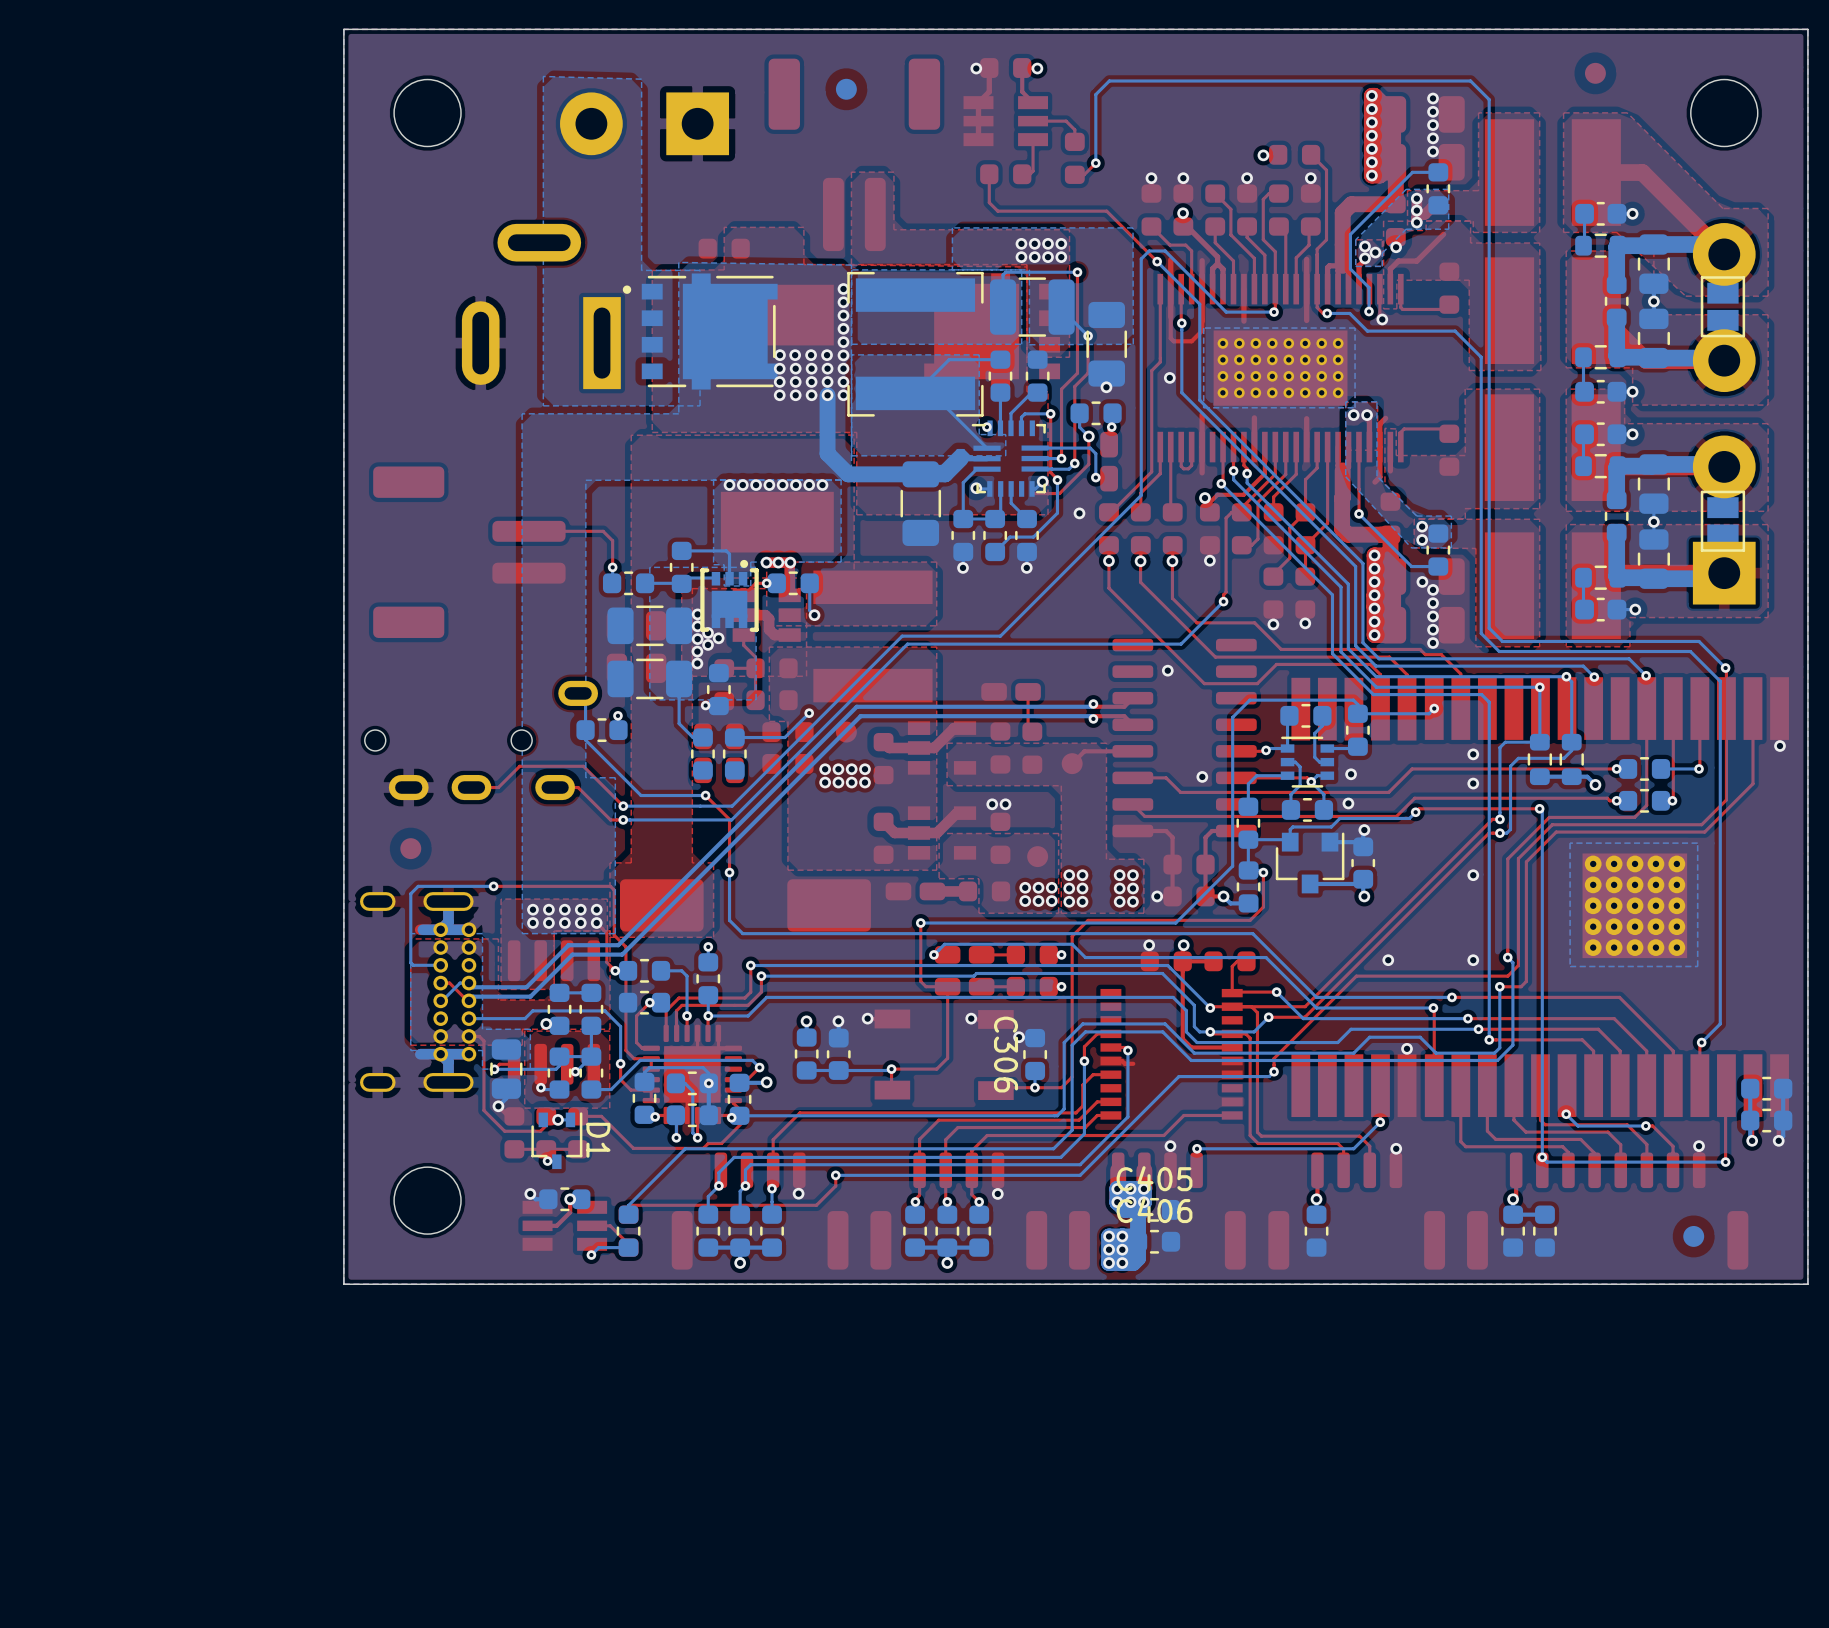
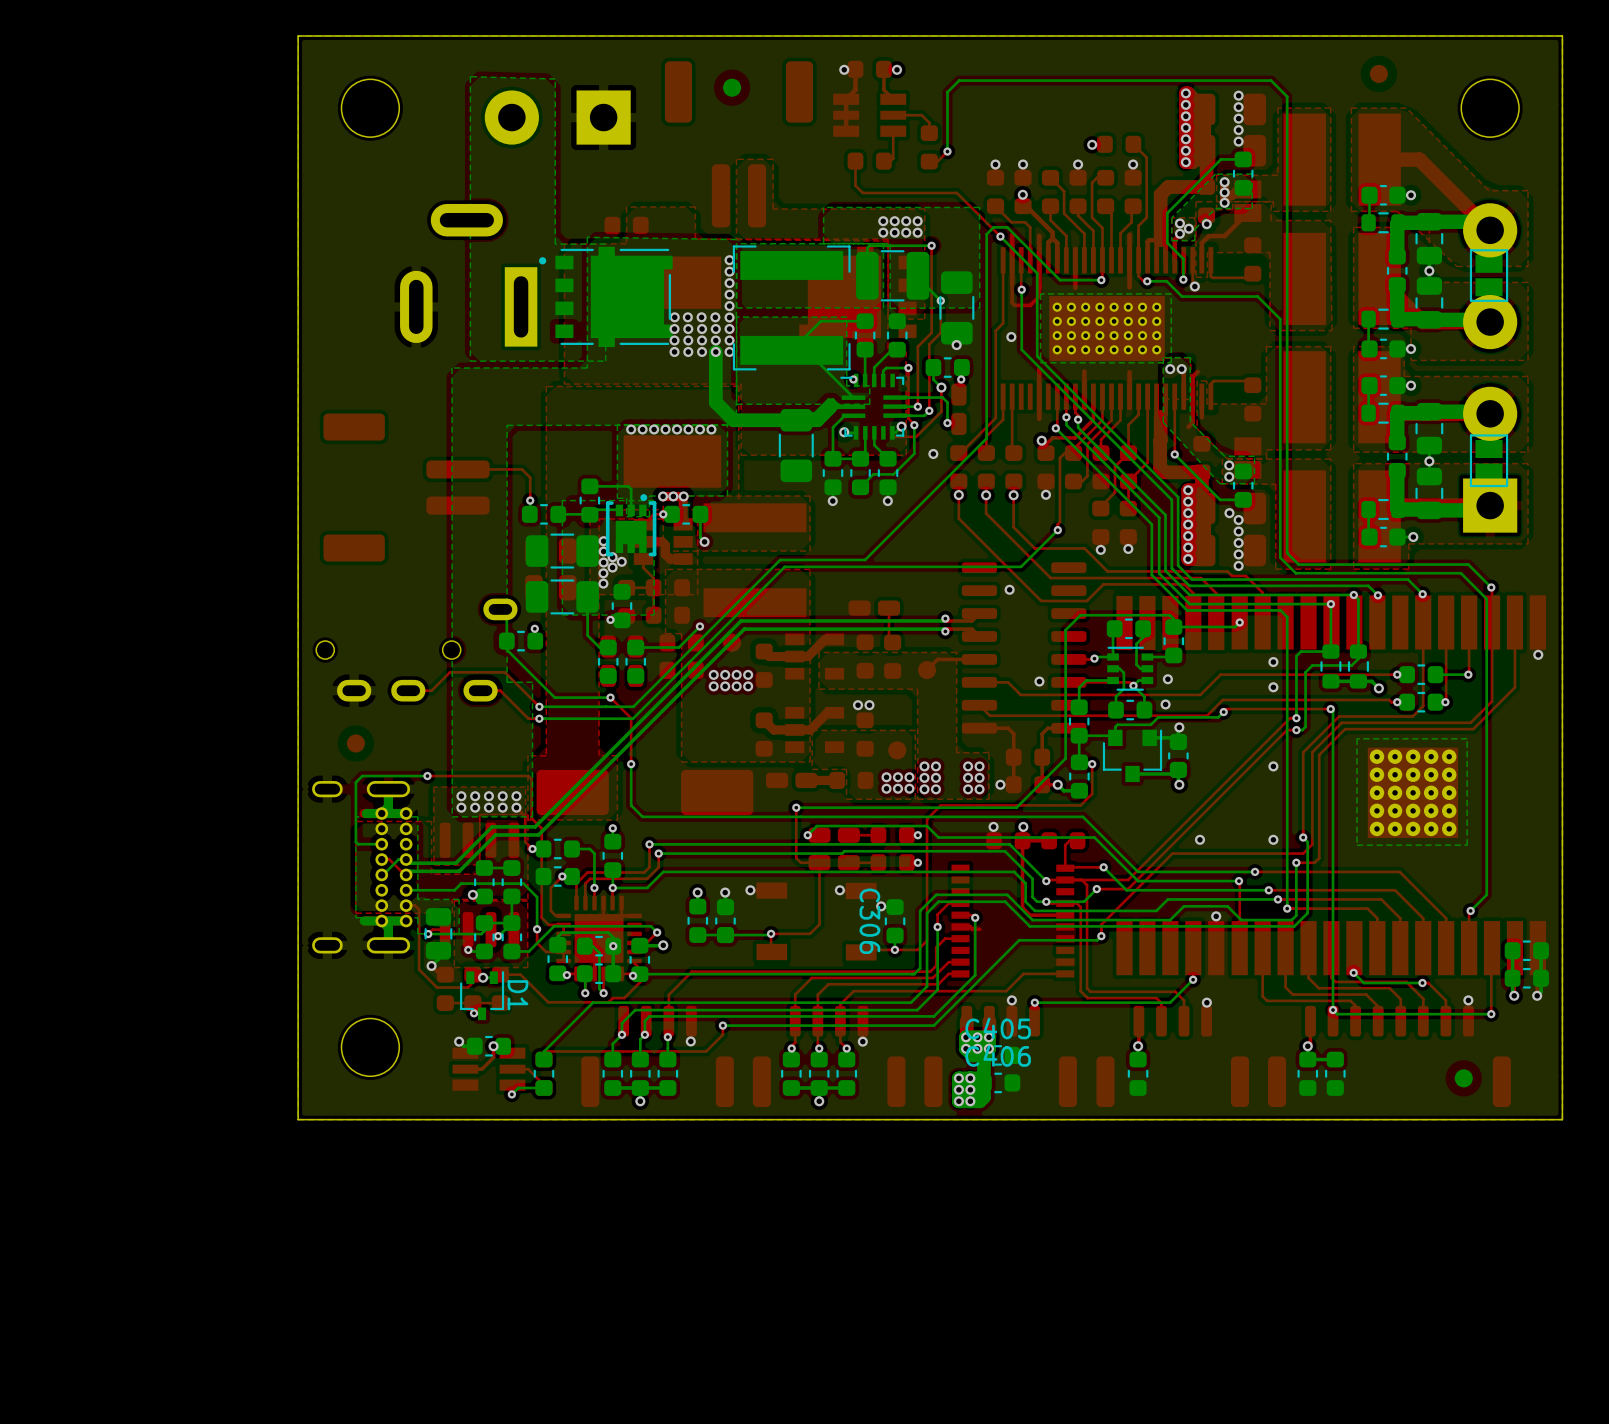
part: none -> (1247, 201)
top track: (1191, 447) (1191, 465) (1188, 468) (1183, 468) (1181, 466) (1181, 447) -> none
part: none -> (1247, 458)

